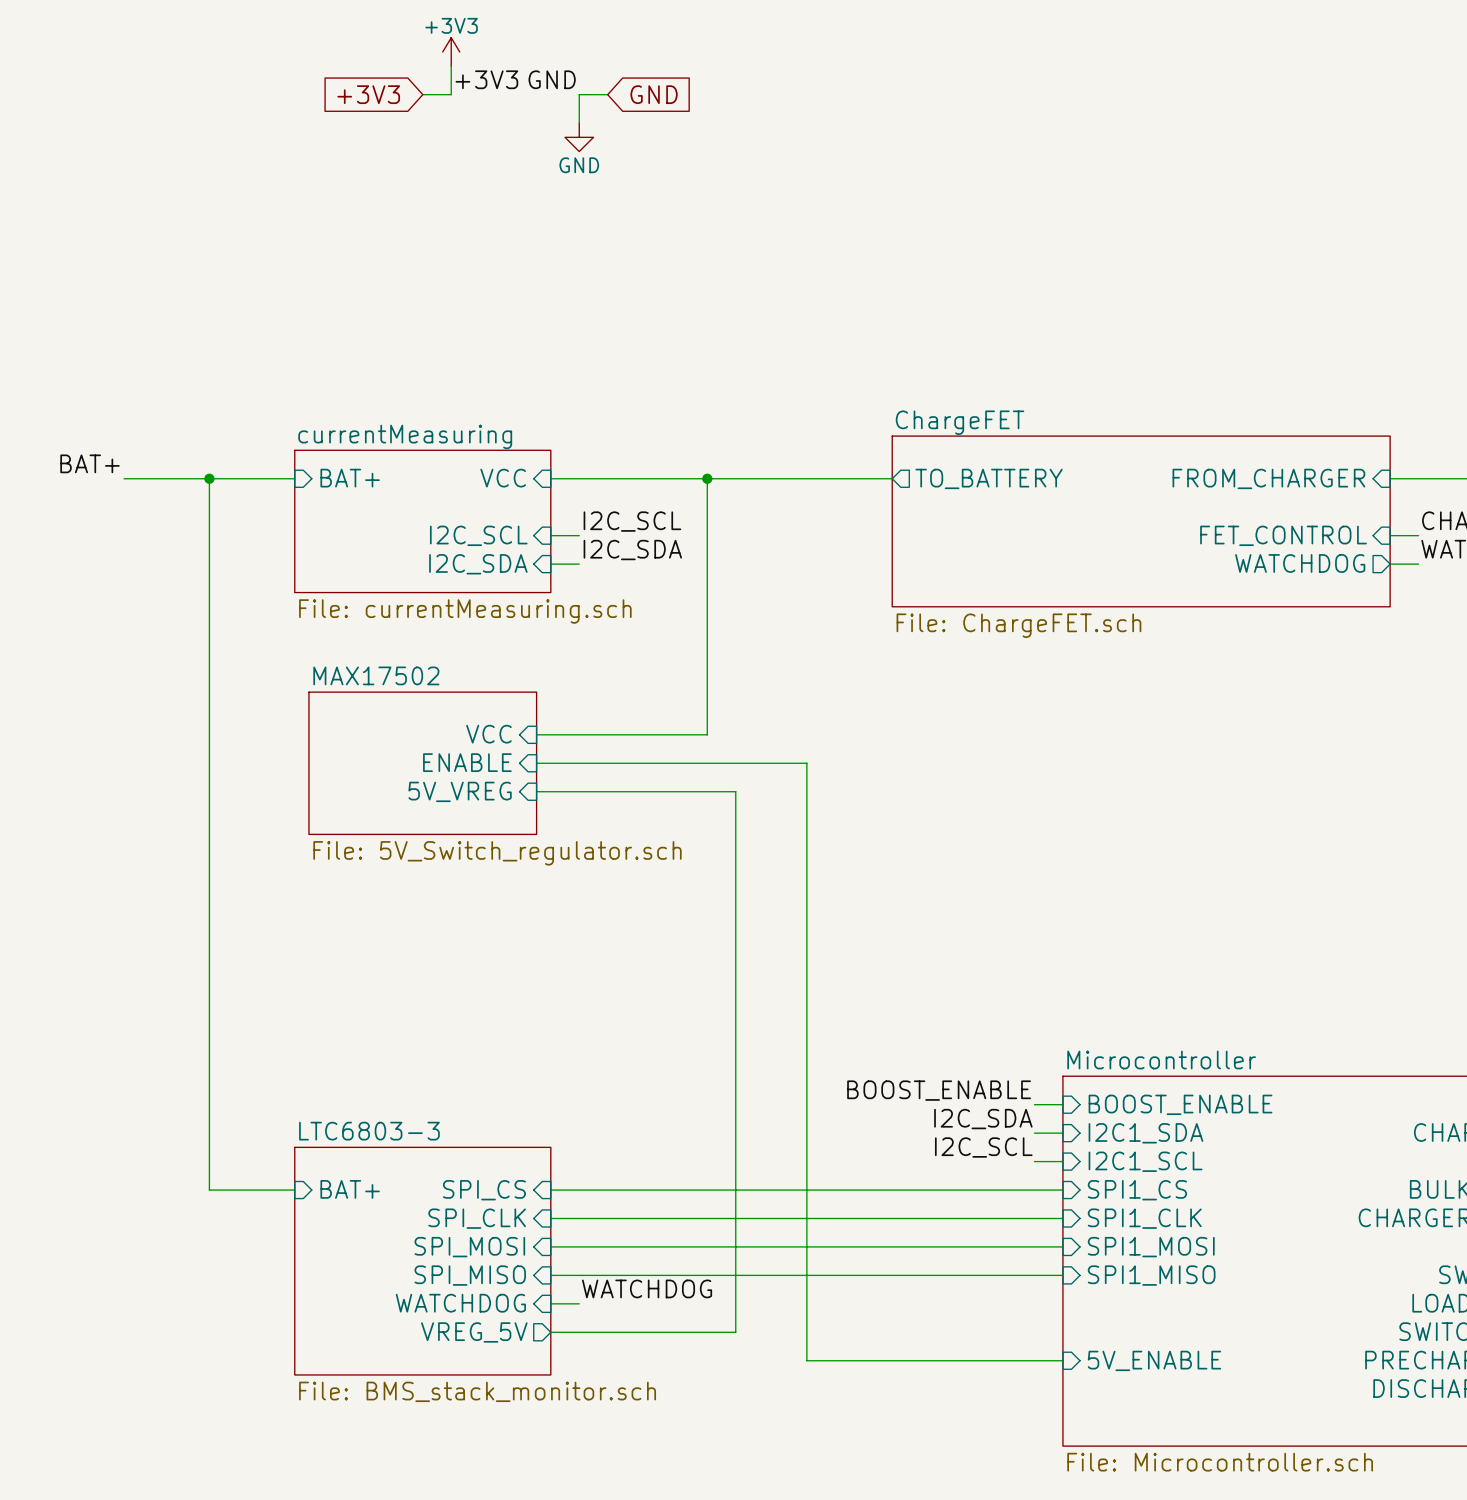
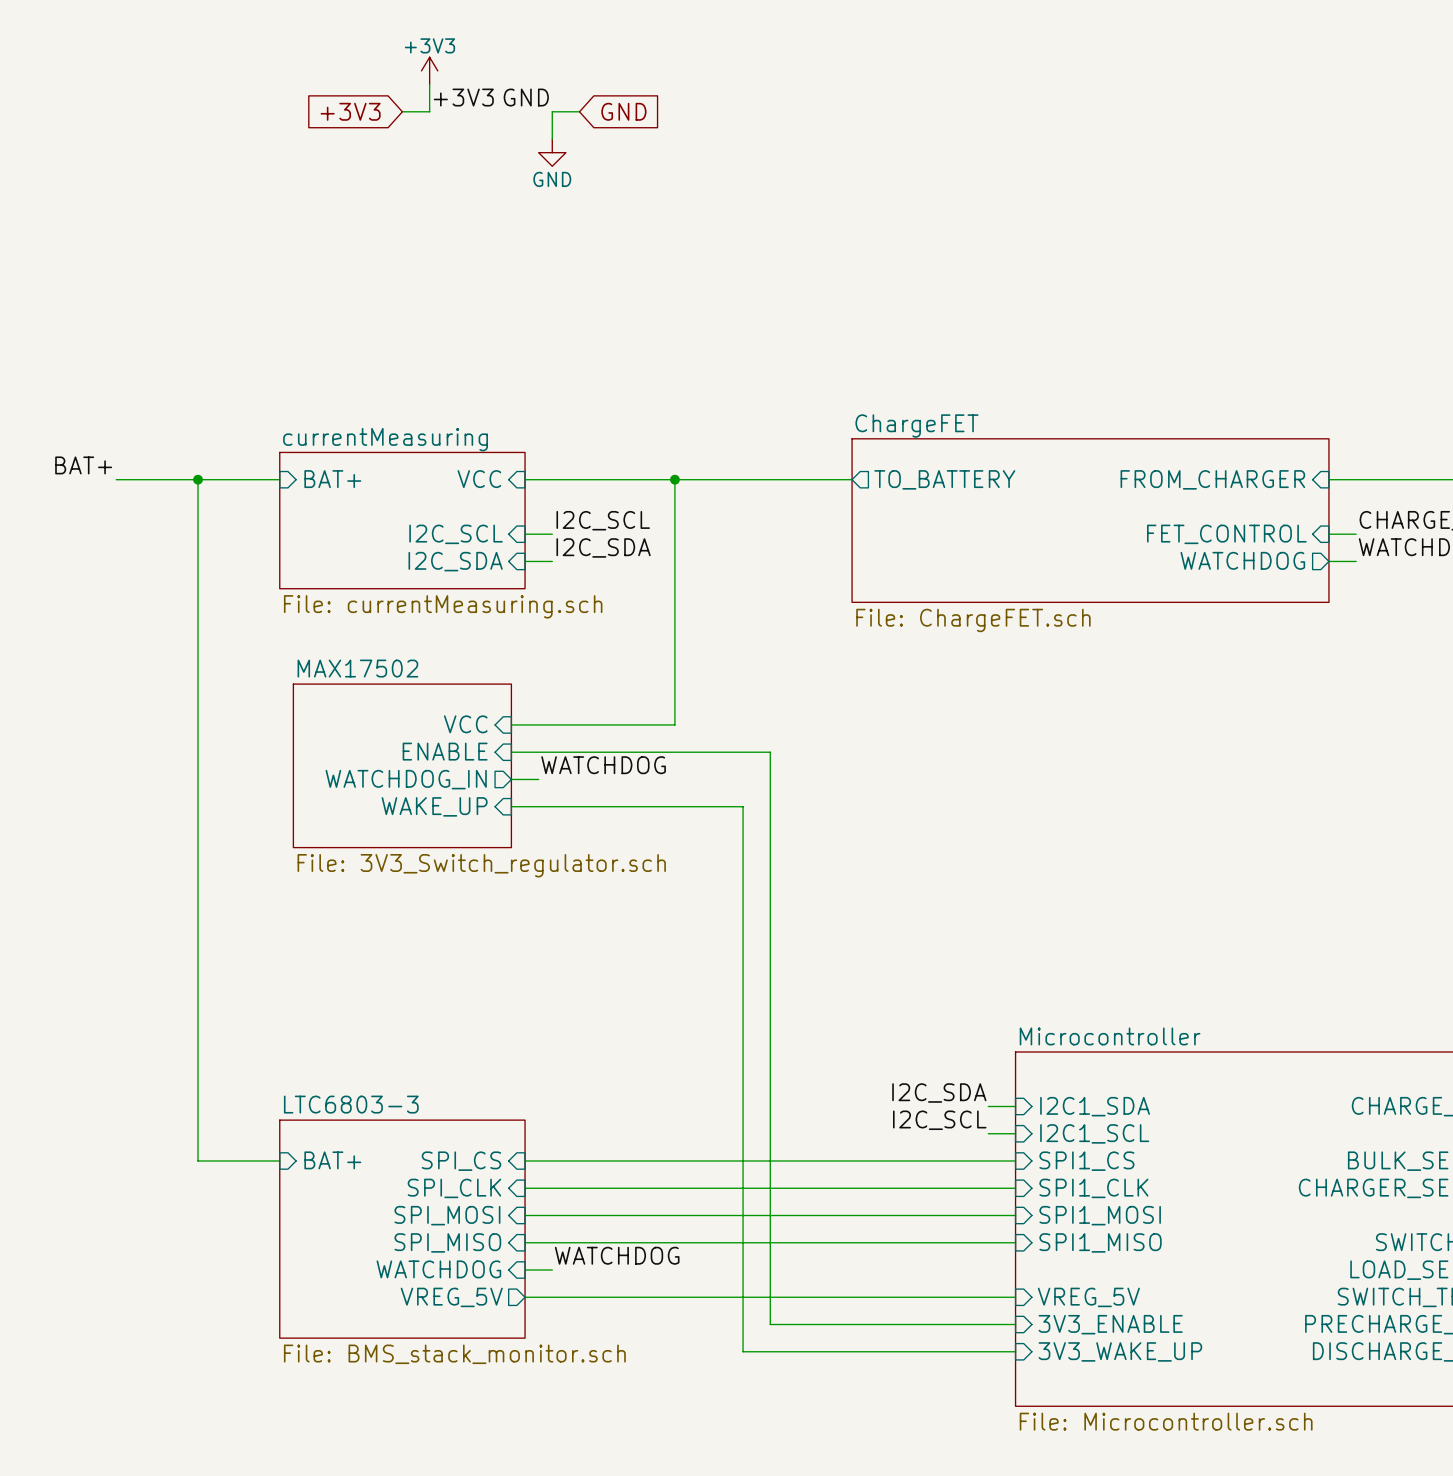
sheet MAX17502 shape: [308, 692, 537, 835] -> [293, 684, 512, 848]
label: none -> WATCHDOG (603, 765)
sheet pin shape: input (460, 791) -> output (406, 779)
sheet pin: 5V_VREG (460, 791) -> WATCHDOG_IN (406, 779)
wire: (565, 791) (735, 791) (735, 1332) -> (1015, 1297) (702, 1297)
sheet pin: none -> WAKE_UP (434, 806)
wire: none -> (511, 806) (743, 806) (743, 1351) (1015, 1351)
sheet MAX17502 value: File: 5V_Switch_regulator.sch (497, 853) -> File: 3V3_Switch_regulator.sch (481, 865)
label: BOOST_ENABLE (939, 1090) -> none
wire: (1034, 1104) (1062, 1104) -> none
sheet pin: BOOST_ENABLE (1180, 1104) -> none
sheet pin: none -> VREG_5V (1088, 1297)
sheet pin: 5V_ENABLE (1154, 1360) -> 3V3_ENABLE (1110, 1324)
sheet pin: none -> 3V3_WAKE_UP (1120, 1351)

